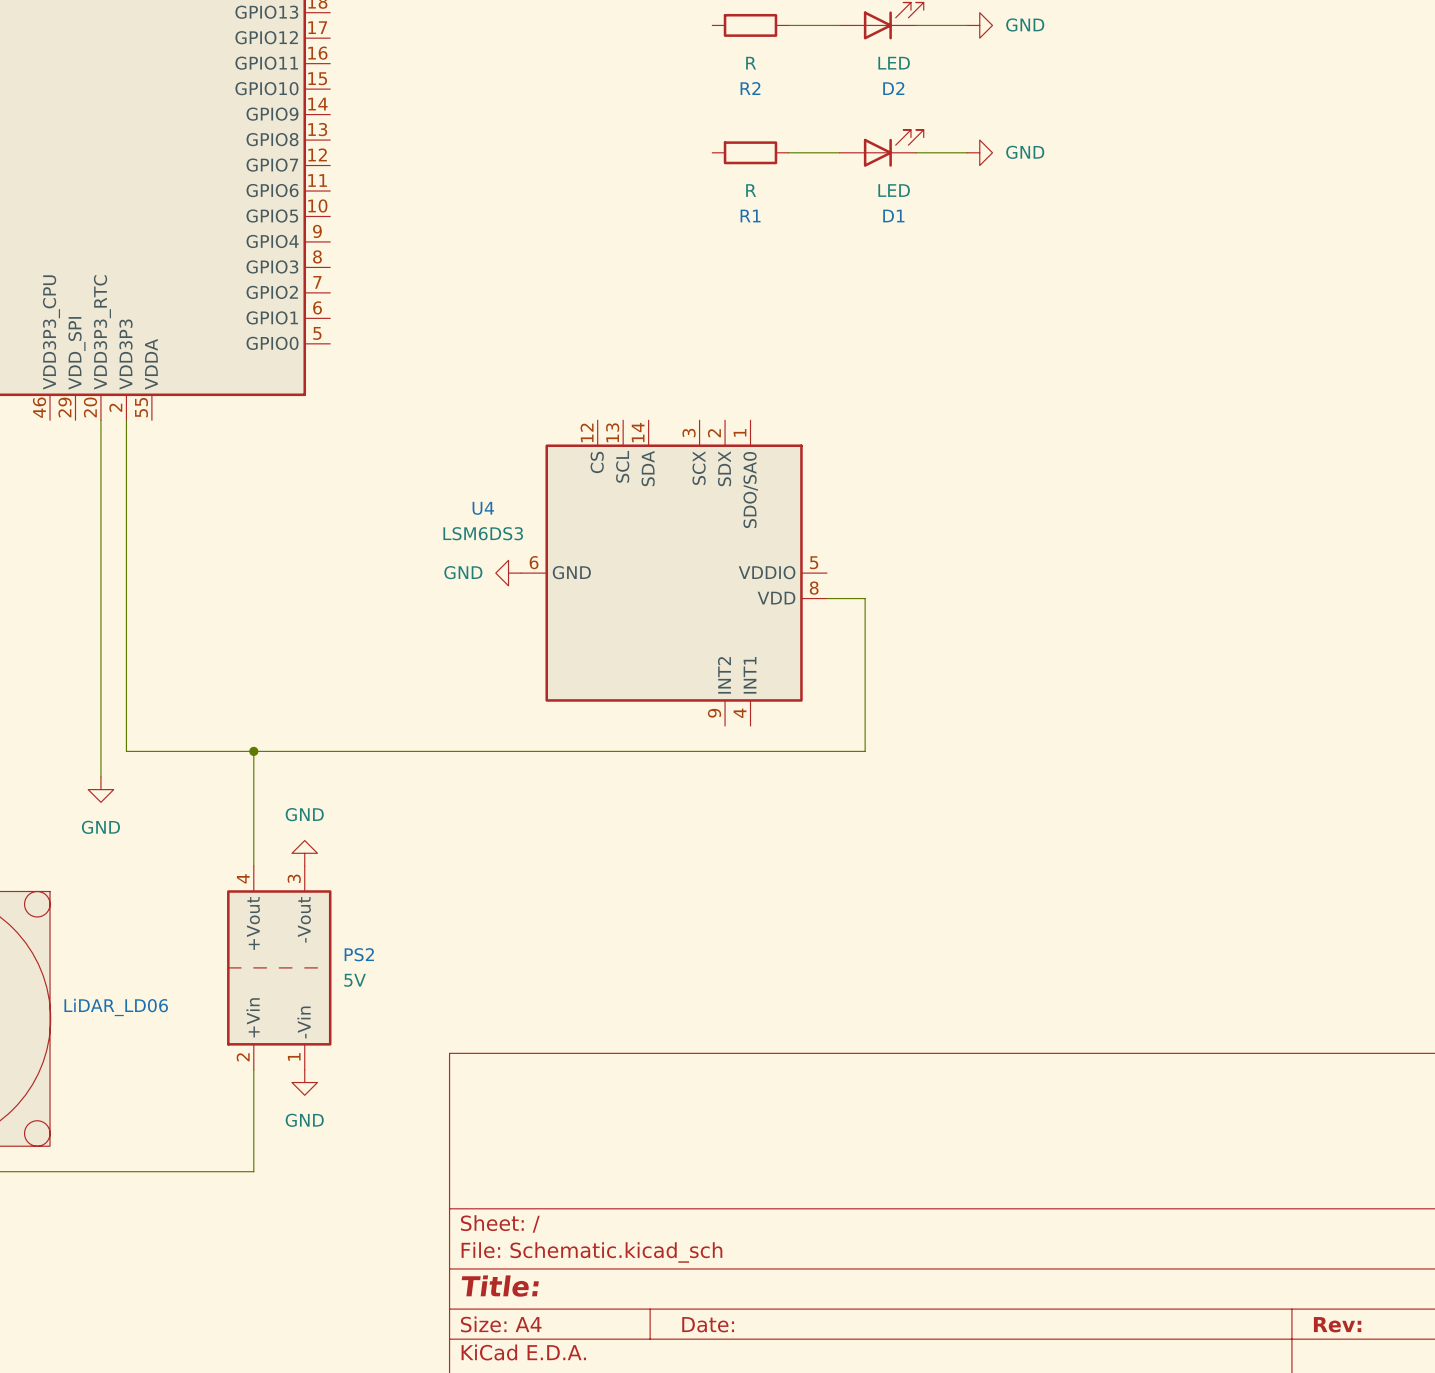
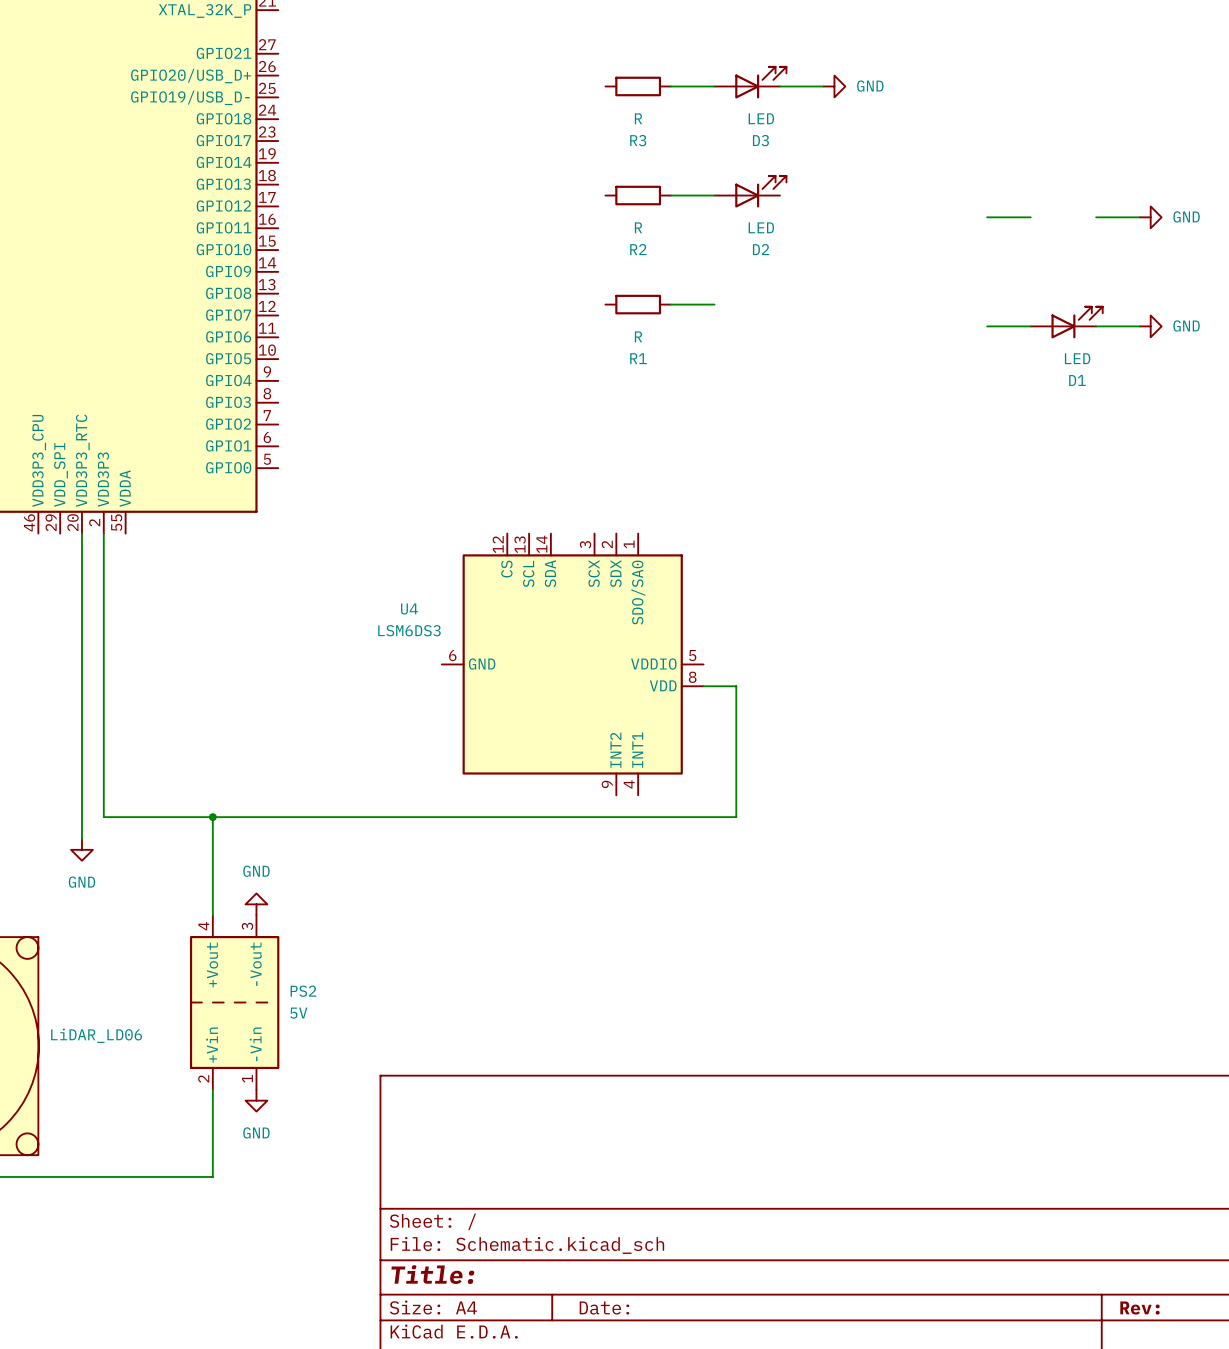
wire: (916, 25) (967, 25) -> (987, 217) (1030, 217)
power symbol: GND (979, 25) -> none
wire: none -> (1096, 217) (1139, 217)
power symbol: none -> GND (1150, 217)
D1 position: (881, 148) -> (1066, 322)
wire: (916, 152) (967, 152) -> (987, 326) (1030, 326)
power symbol: GND (979, 152) -> none
wire: none -> (1096, 326) (1139, 326)
power symbol: none -> GND (1150, 326)
power symbol: GND (508, 573) -> none

